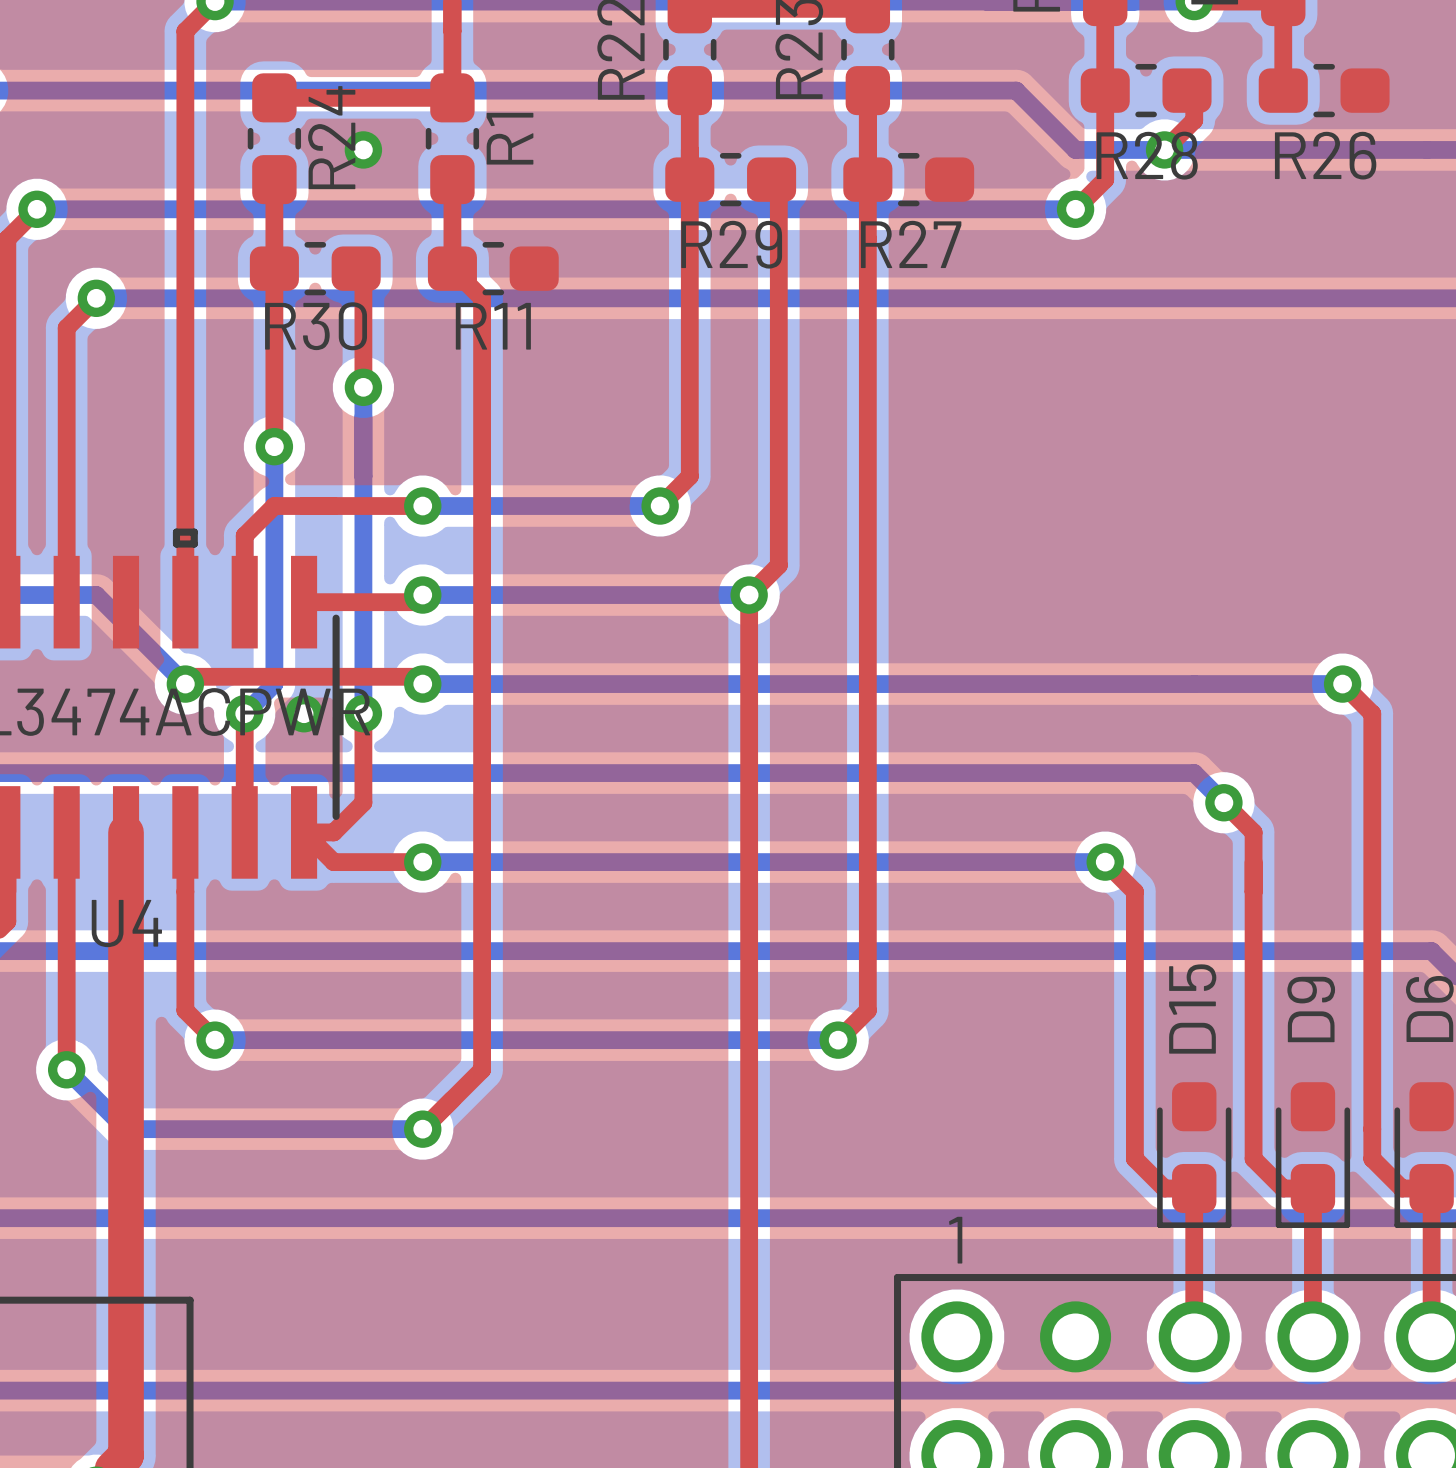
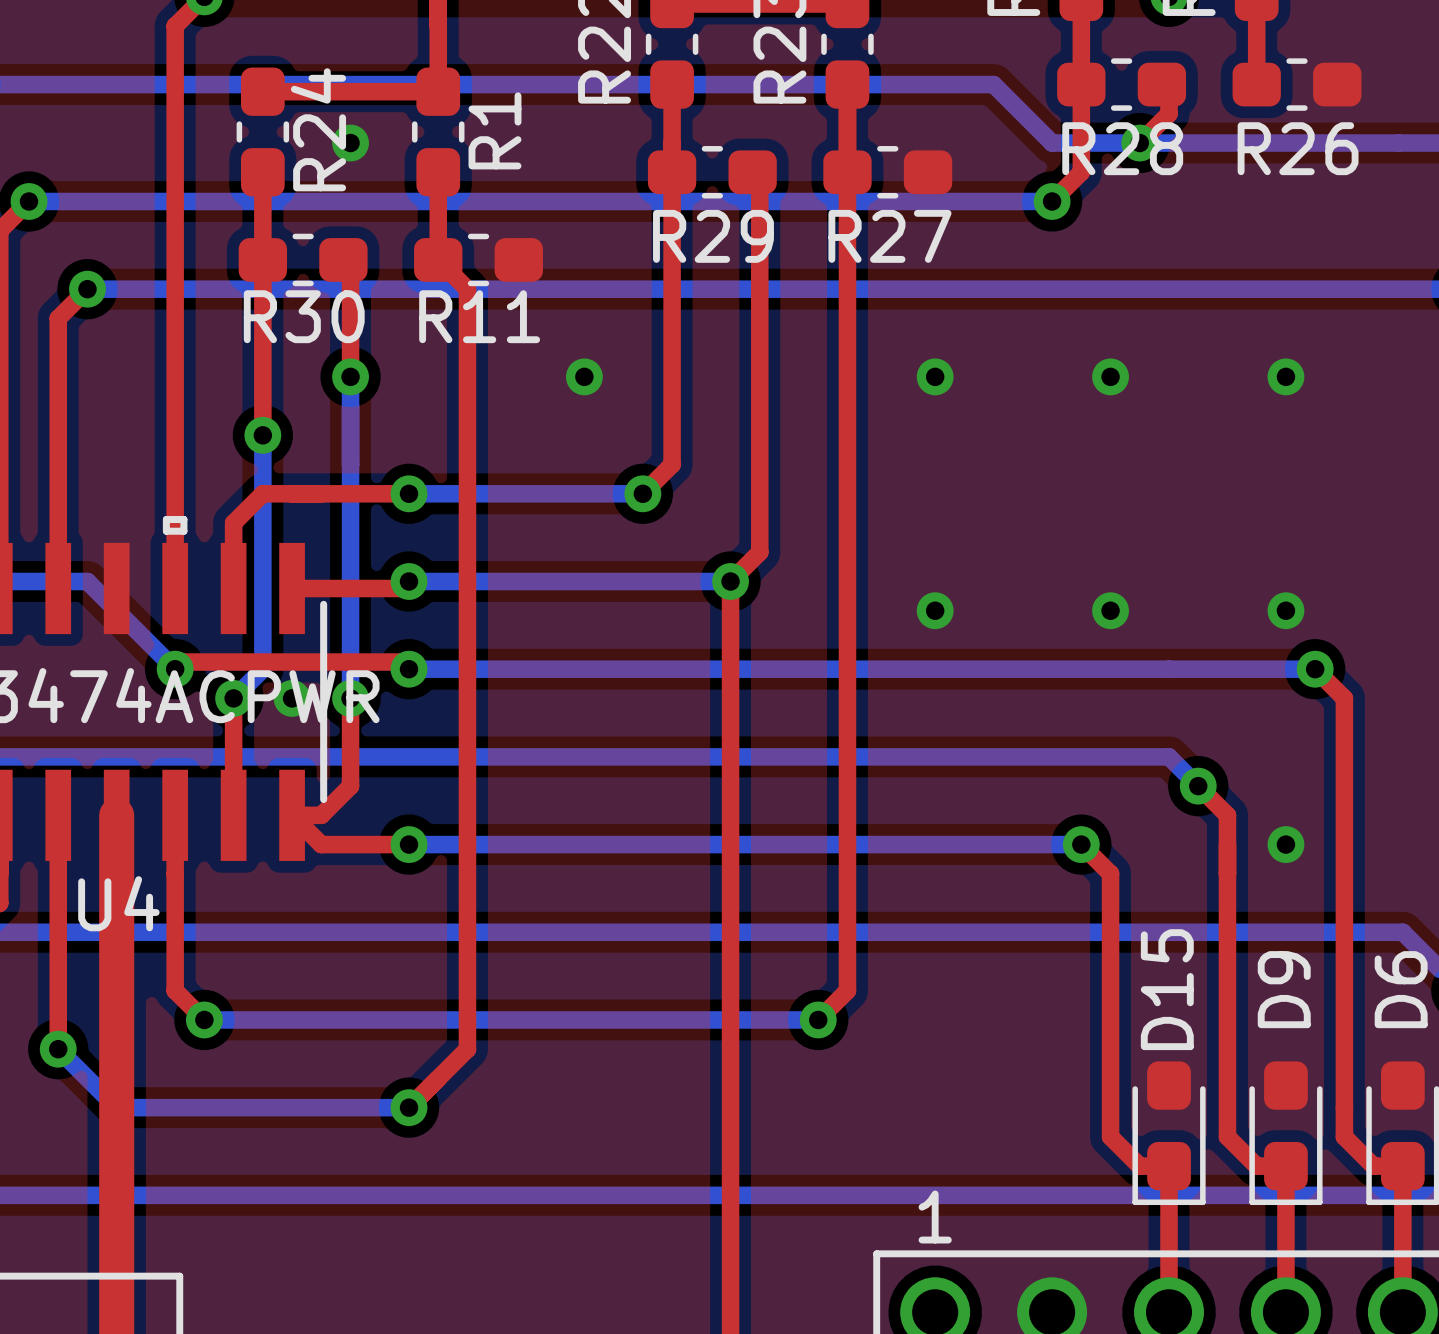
via: none -> (584, 376)
via: none -> (935, 376)
via: none -> (1110, 376)
via: none -> (1285, 376)
via: none -> (935, 610)
via: none -> (1110, 610)
via: none -> (1285, 610)
via: none -> (1285, 844)

